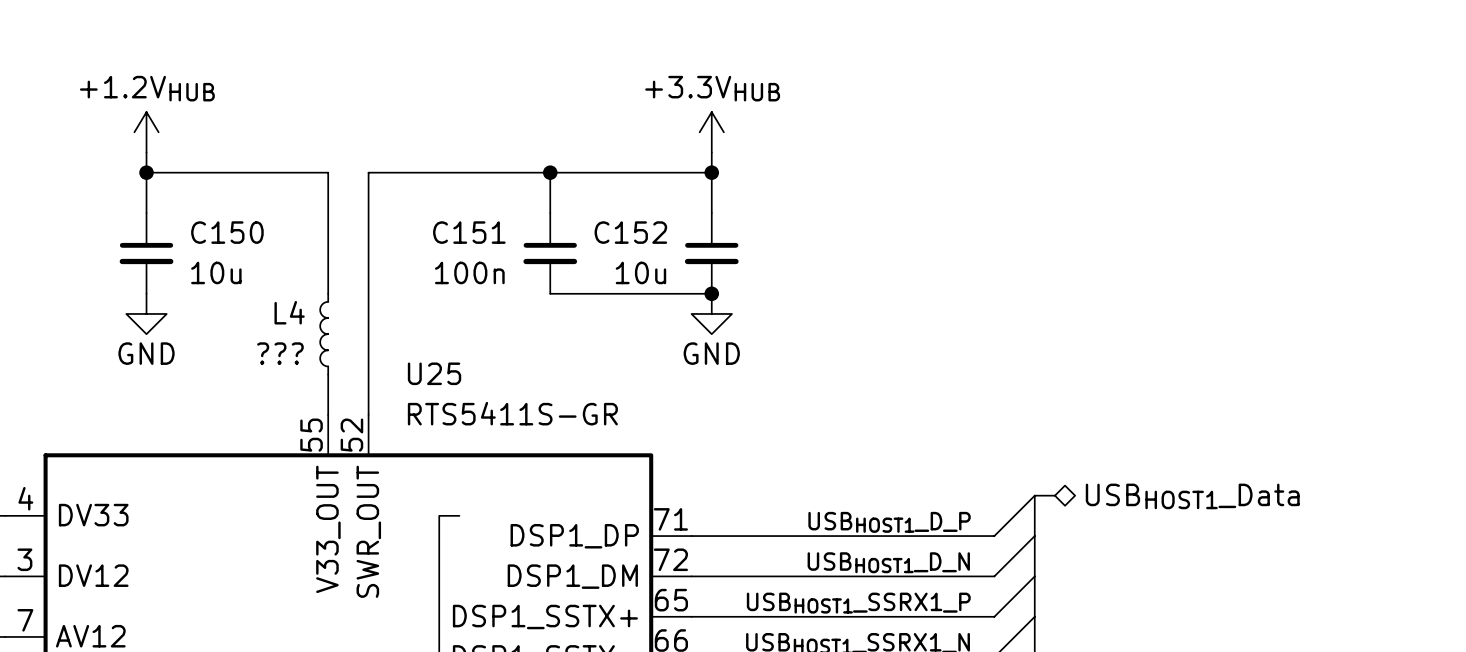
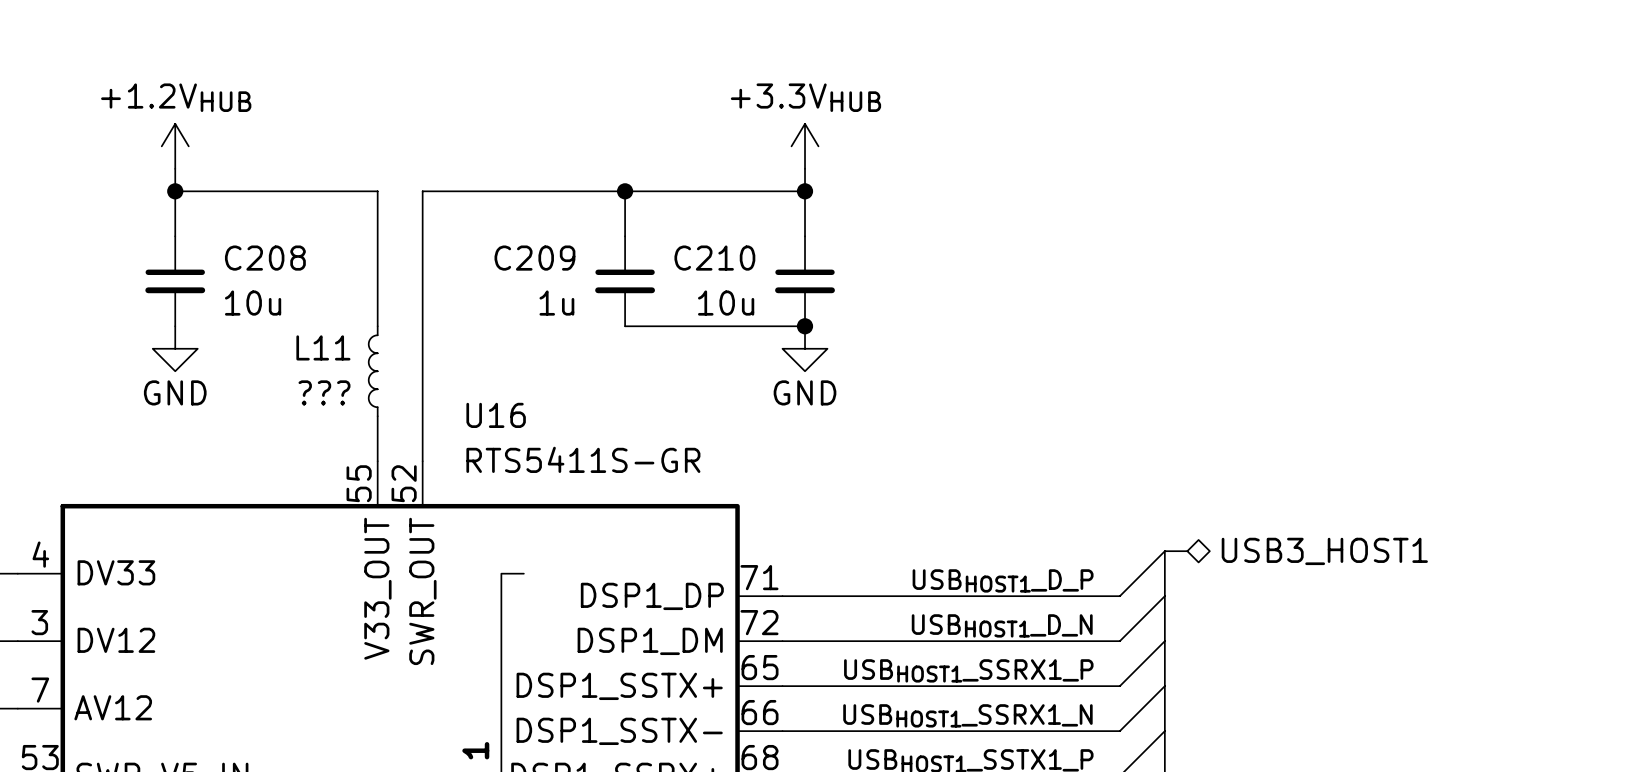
C150 name: C150 (227, 232) -> C208 (265, 258)
C151 name: C151 (469, 232) -> C209 (534, 258)
C152 name: C152 (630, 232) -> C210 (714, 258)
C151 value: 100n (469, 272) -> 1u (556, 303)
L4 name: L4 (289, 312) -> L11 (323, 347)
U25 name: U25 (434, 373) -> U16 (496, 415)
hierarchical label: USBHOST1_Data (1192, 496) -> USB3_HOST1 (1324, 551)

